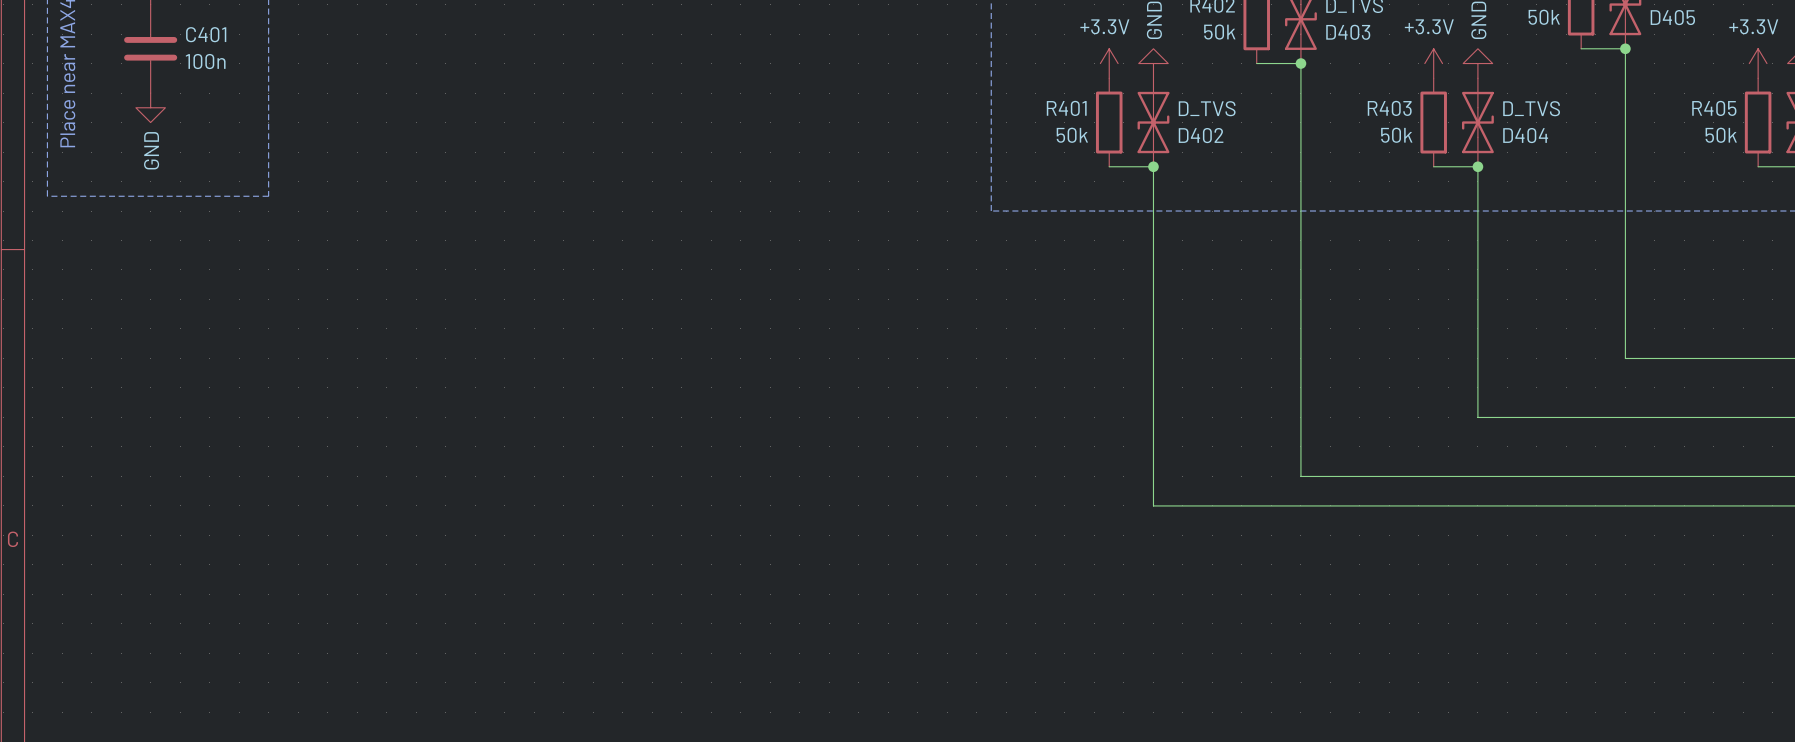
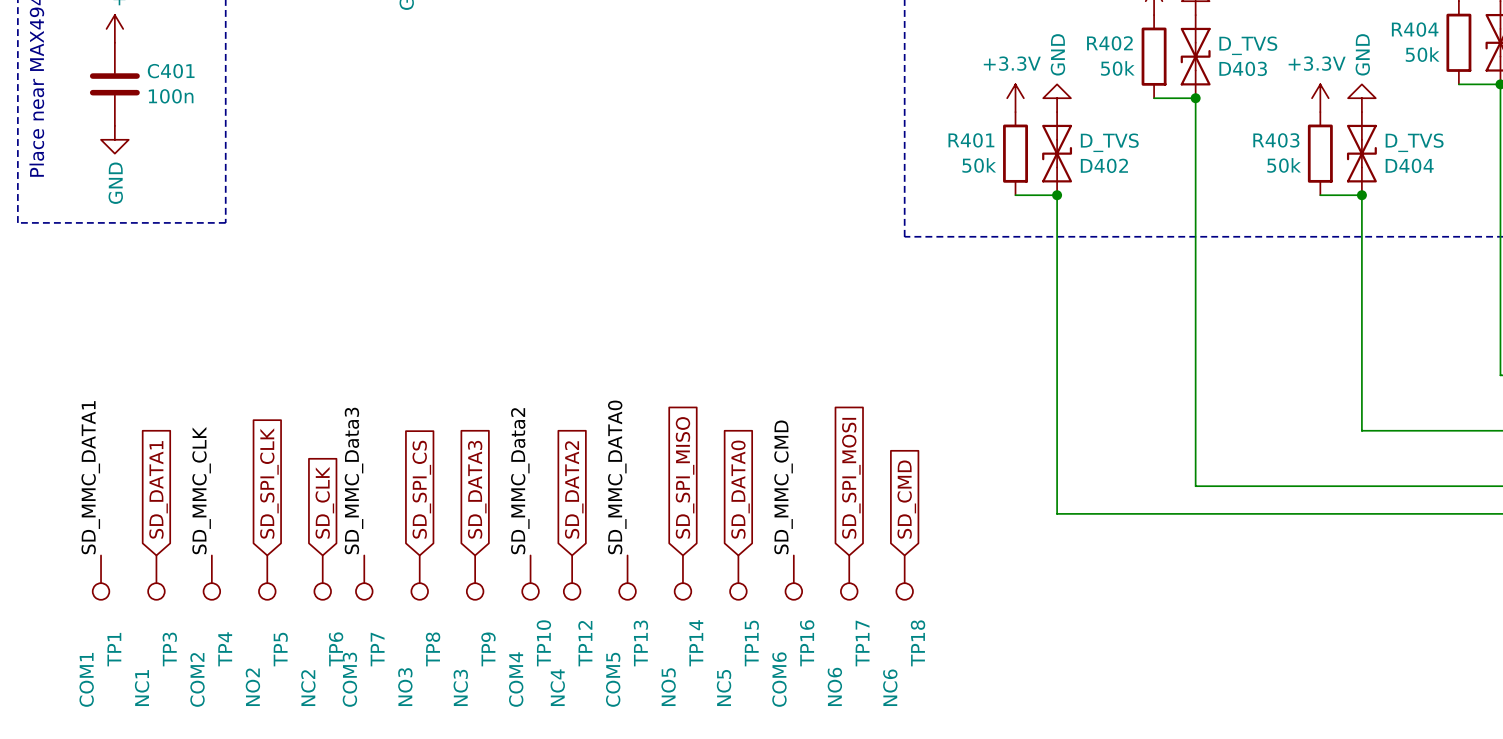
global label: none -> SD_SPI_MISO (685, 477)
global label: none -> SD_SPI_MOSI (851, 478)
label: none -> SD_MMC_DATA0 (617, 477)
global label: none -> SD_SPI_CLK (269, 483)
label: none -> SD_MMC_DATA1 (90, 477)
label: none -> SD_MMC_Data3 (354, 480)
label: none -> SD_MMC_Data2 (520, 481)
global label: none -> SD_SPI_CS (421, 489)
global label: none -> SD_DATA2 (574, 489)
global label: none -> SD_DATA0 (740, 489)
global label: none -> SD_DATA3 (477, 489)
label: none -> SD_MMC_CMD (783, 487)
label: none -> SD_MMC_CLK (201, 490)
global label: none -> SD_DATA1 (158, 489)
global label: none -> SD_CMD (906, 499)
global label: none -> SD_CLK (324, 502)
TP1: none -> COM1 (101, 577)
TP3: none -> NC1 (156, 577)
TP4: none -> COM2 (211, 577)
TP5: none -> NO2 (267, 577)
TP6: none -> NC2 (322, 577)
TP7: none -> COM3 (364, 577)
TP8: none -> NO3 (419, 577)
TP9: none -> NC3 (475, 577)
TP10: none -> COM4 (530, 577)
TP12: none -> NC4 (572, 577)
TP13: none -> COM5 (627, 577)
TP14: none -> NO5 (682, 577)
TP15: none -> NC5 (738, 577)
TP16: none -> COM6 (793, 577)
TP17: none -> NO6 (849, 577)
TP18: none -> NC6 (904, 577)

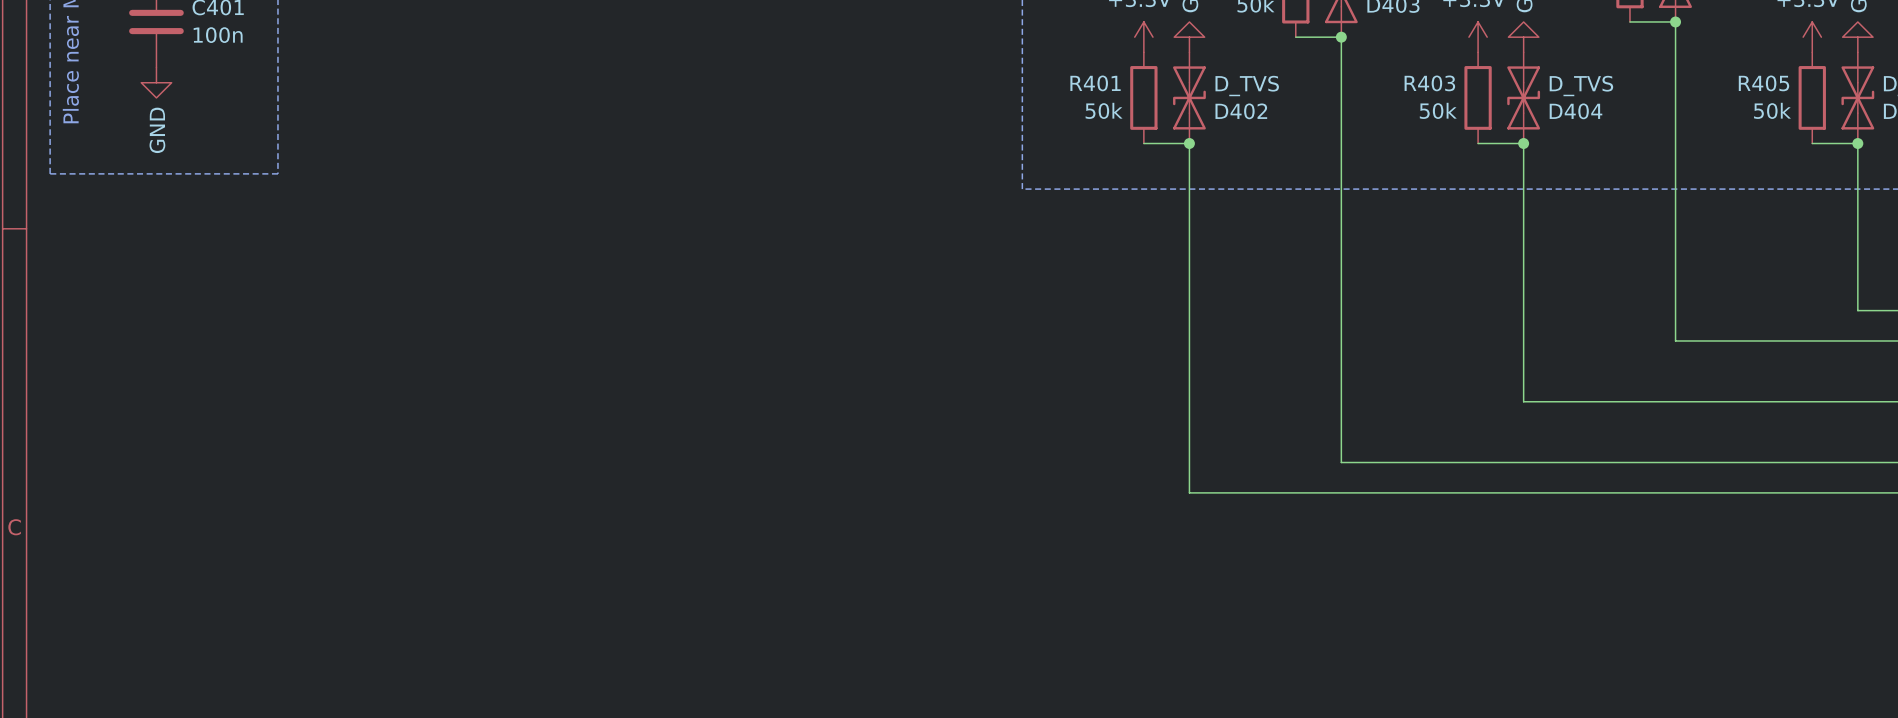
label: SD_MMC_DATA1 (90, 477) -> none
label: SD_MMC_DATA0 (617, 477) -> none
global label: SD_SPI_MISO (685, 477) -> none
global label: SD_SPI_MOSI (851, 478) -> none
label: SD_MMC_Data3 (354, 480) -> none
label: SD_MMC_Data2 (520, 481) -> none
global label: SD_SPI_CLK (269, 483) -> none
label: SD_MMC_CMD (783, 487) -> none
global label: SD_DATA1 (158, 489) -> none
global label: SD_SPI_CS (421, 489) -> none
global label: SD_DATA3 (477, 489) -> none
global label: SD_DATA2 (574, 489) -> none
global label: SD_DATA0 (740, 489) -> none
label: SD_MMC_CLK (201, 490) -> none
global label: SD_CMD (906, 499) -> none
global label: SD_CLK (324, 502) -> none
TP1: COM1 (101, 577) -> none
TP3: NC1 (156, 577) -> none
TP4: COM2 (211, 577) -> none
TP5: NO2 (267, 577) -> none
TP6: NC2 (322, 577) -> none
TP7: COM3 (364, 577) -> none
TP8: NO3 (419, 577) -> none
TP9: NC3 (475, 577) -> none
TP10: COM4 (530, 577) -> none
TP12: NC4 (572, 577) -> none
TP13: COM5 (627, 577) -> none
TP14: NO5 (682, 577) -> none
TP15: NC5 (738, 577) -> none
TP16: COM6 (793, 577) -> none
TP17: NO6 (849, 577) -> none
TP18: NC6 (904, 577) -> none

